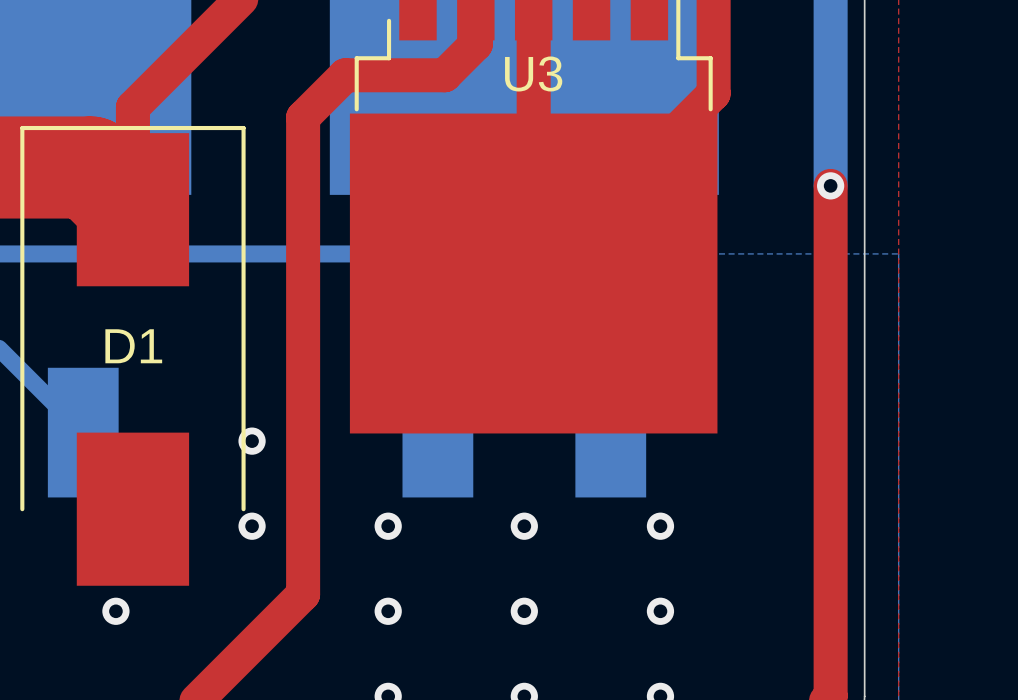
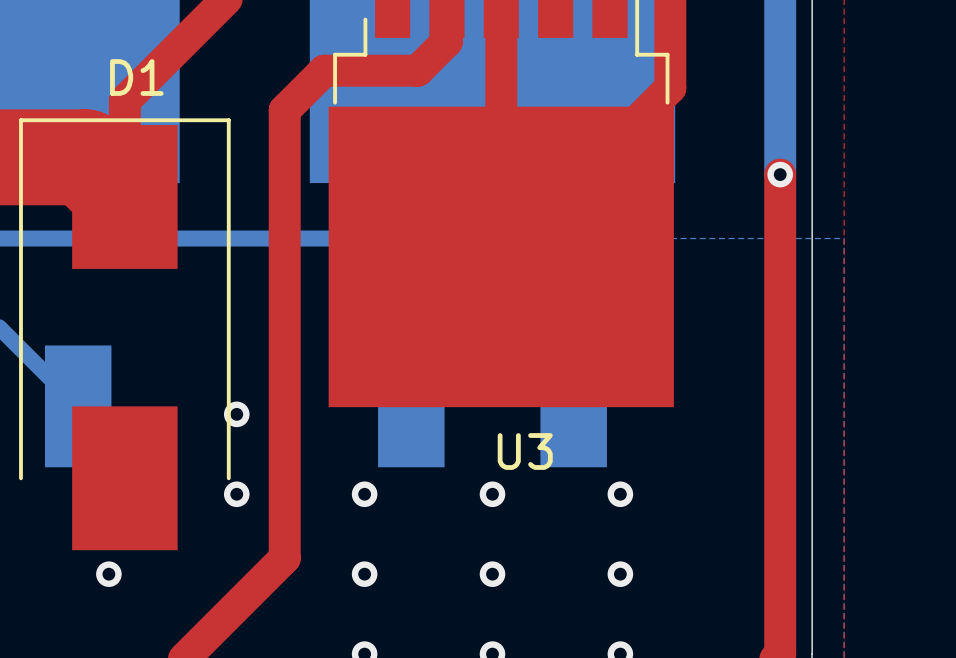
U3 name position: U3 (533, 73) -> U3 (525, 451)
D1 name position: D1 (133, 346) -> D1 (136, 77)

